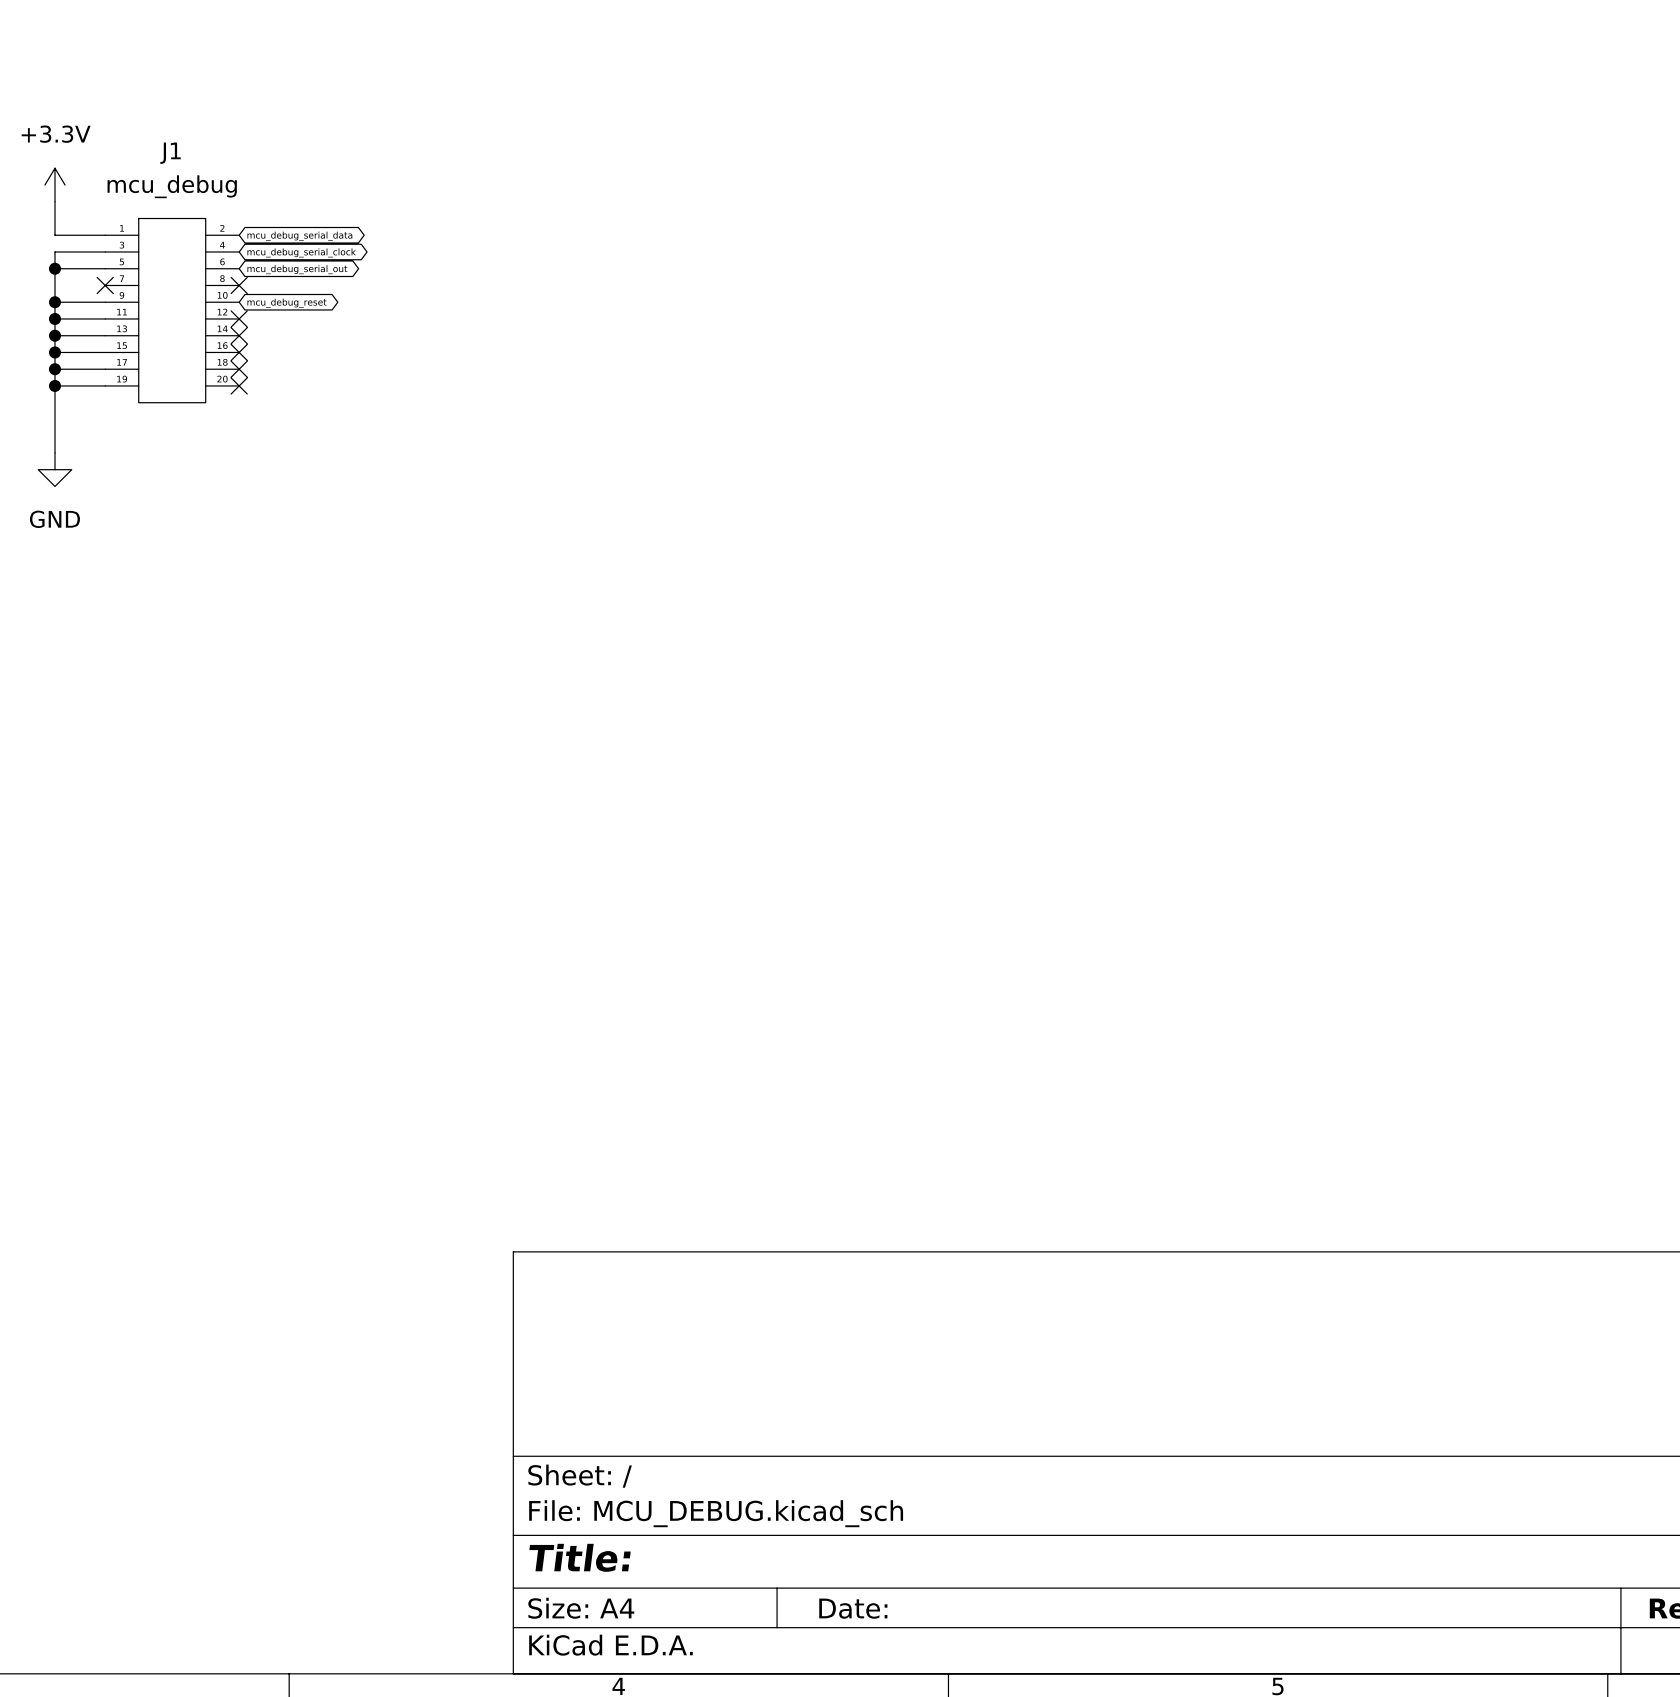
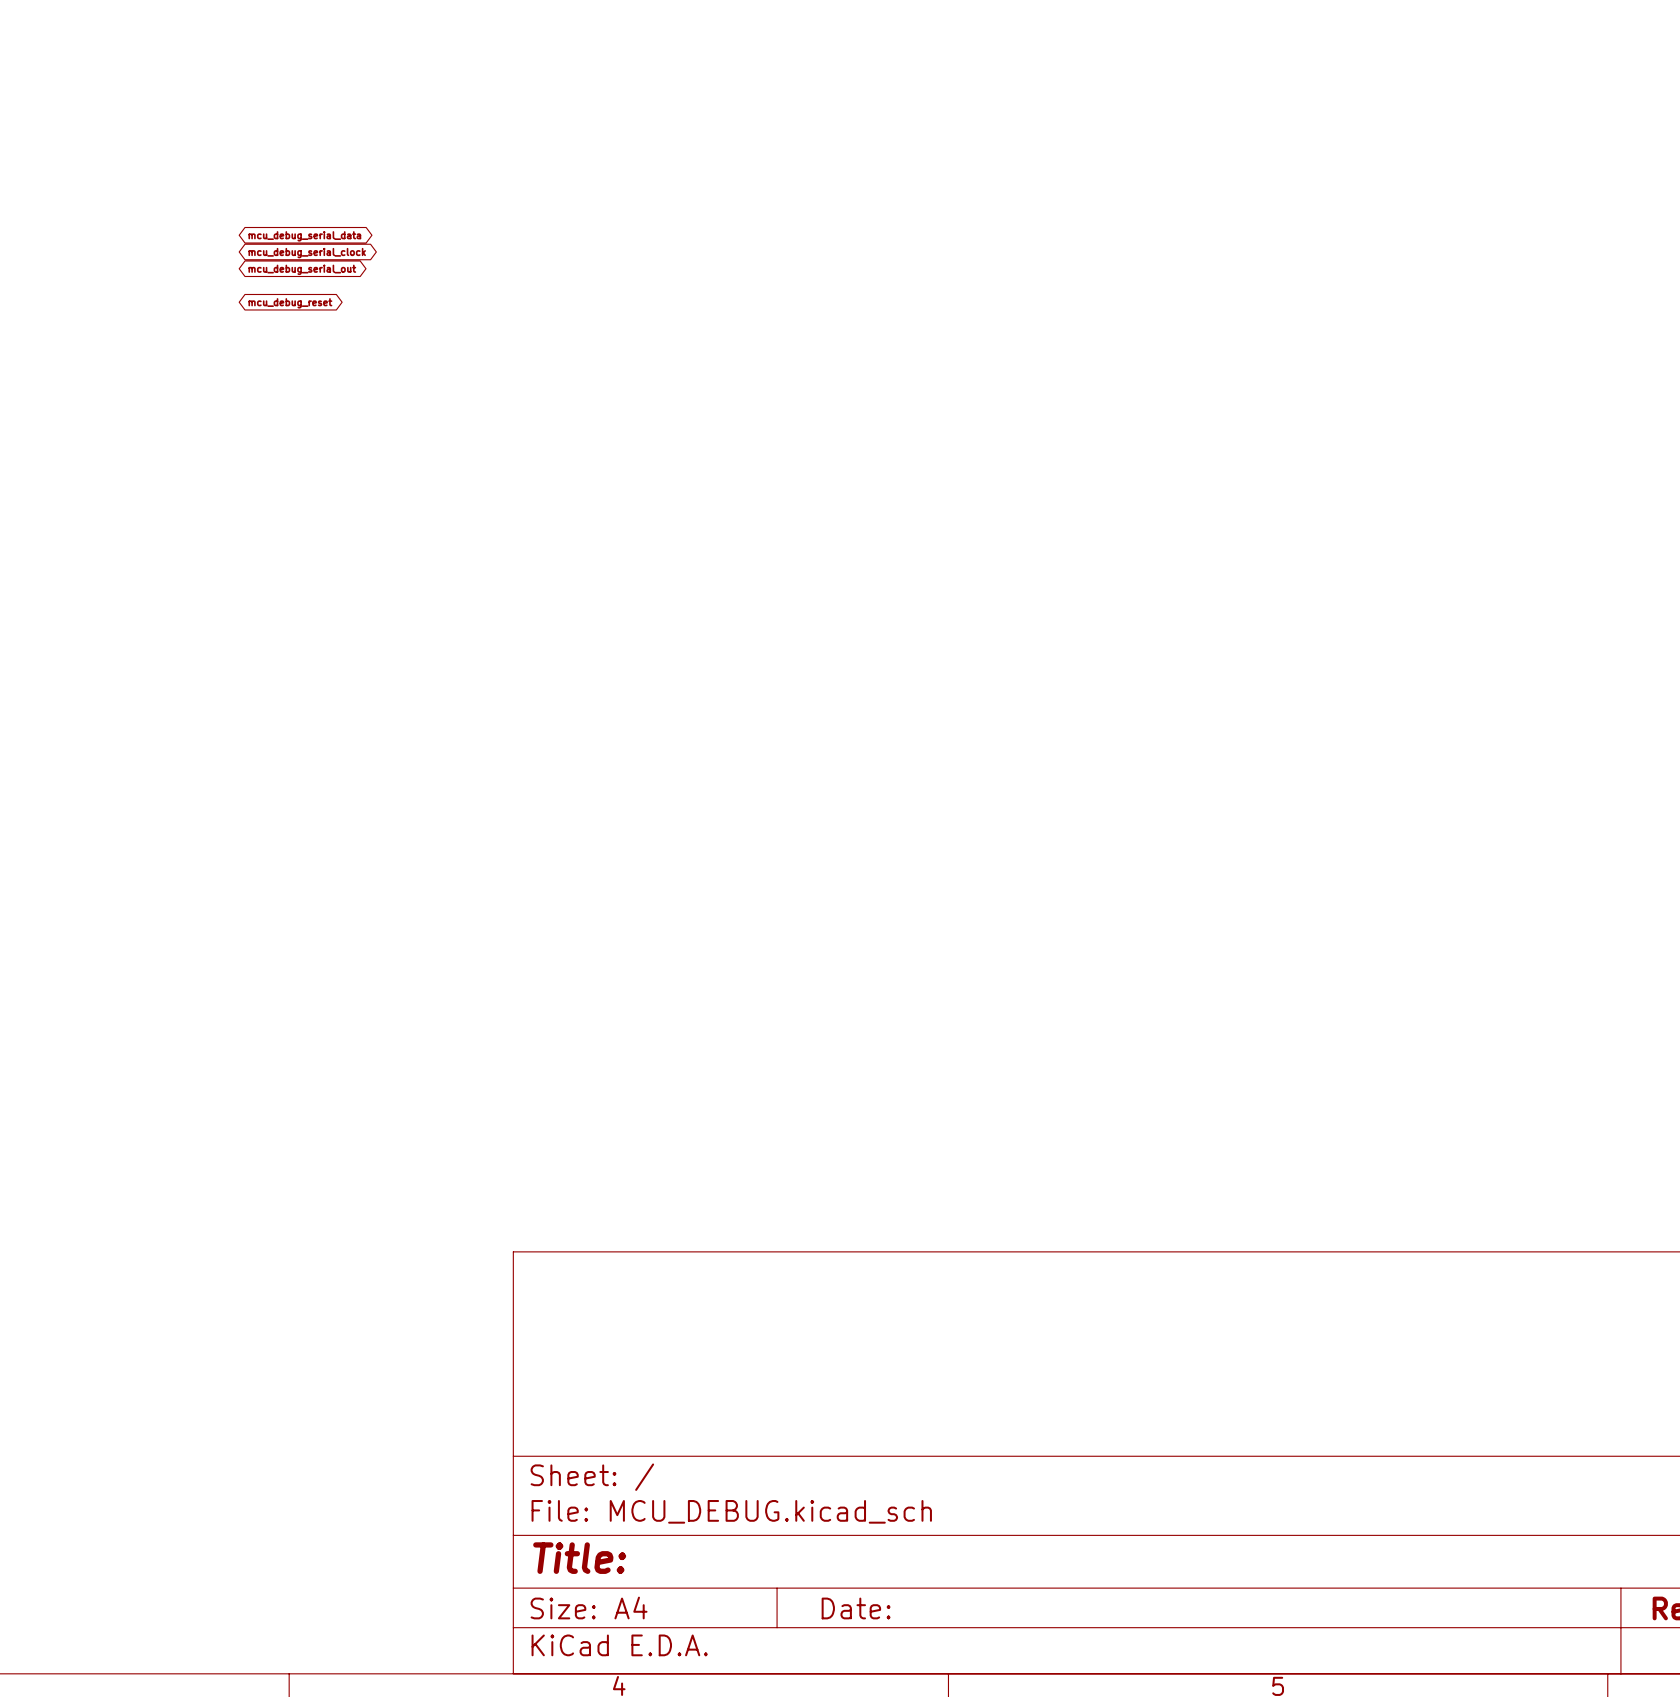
power symbol: +3.3V (54, 185) -> none
wire: (54, 201) (54, 235) (105, 235) -> none
wire: (105, 251) (54, 251) (54, 452) -> none
wire: (54, 268) (105, 268) -> none
junction: (54, 268) -> none
no-connect mark: (105, 285) -> none
no-connect mark: (239, 285) -> none
wire: (54, 302) (105, 302) -> none
junction: (54, 302) -> none
J1: mcu_debug (172, 310) -> none
wire: (54, 318) (105, 318) -> none
junction: (54, 318) -> none
no-connect mark: (239, 318) -> none
wire: (54, 335) (105, 335) -> none
junction: (54, 335) -> none
no-connect mark: (239, 335) -> none
wire: (54, 352) (105, 352) -> none
junction: (54, 352) -> none
no-connect mark: (239, 352) -> none
wire: (54, 369) (105, 369) -> none
junction: (54, 369) -> none
no-connect mark: (239, 369) -> none
wire: (54, 385) (105, 385) -> none
junction: (54, 385) -> none
no-connect mark: (239, 385) -> none
power symbol: GND (54, 469) -> none

